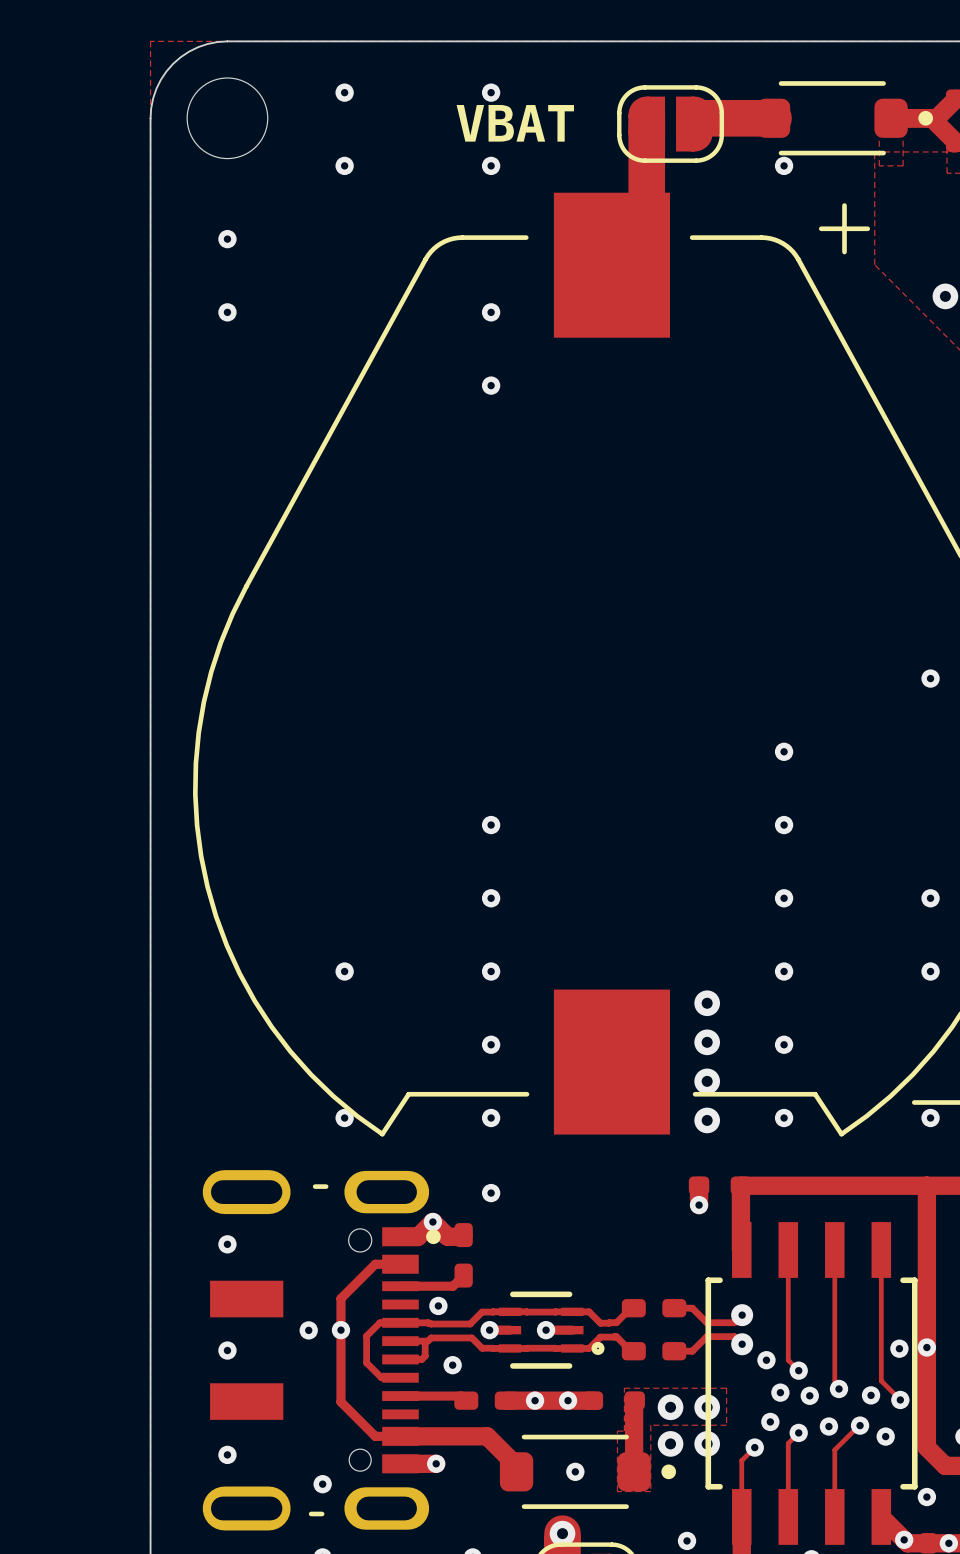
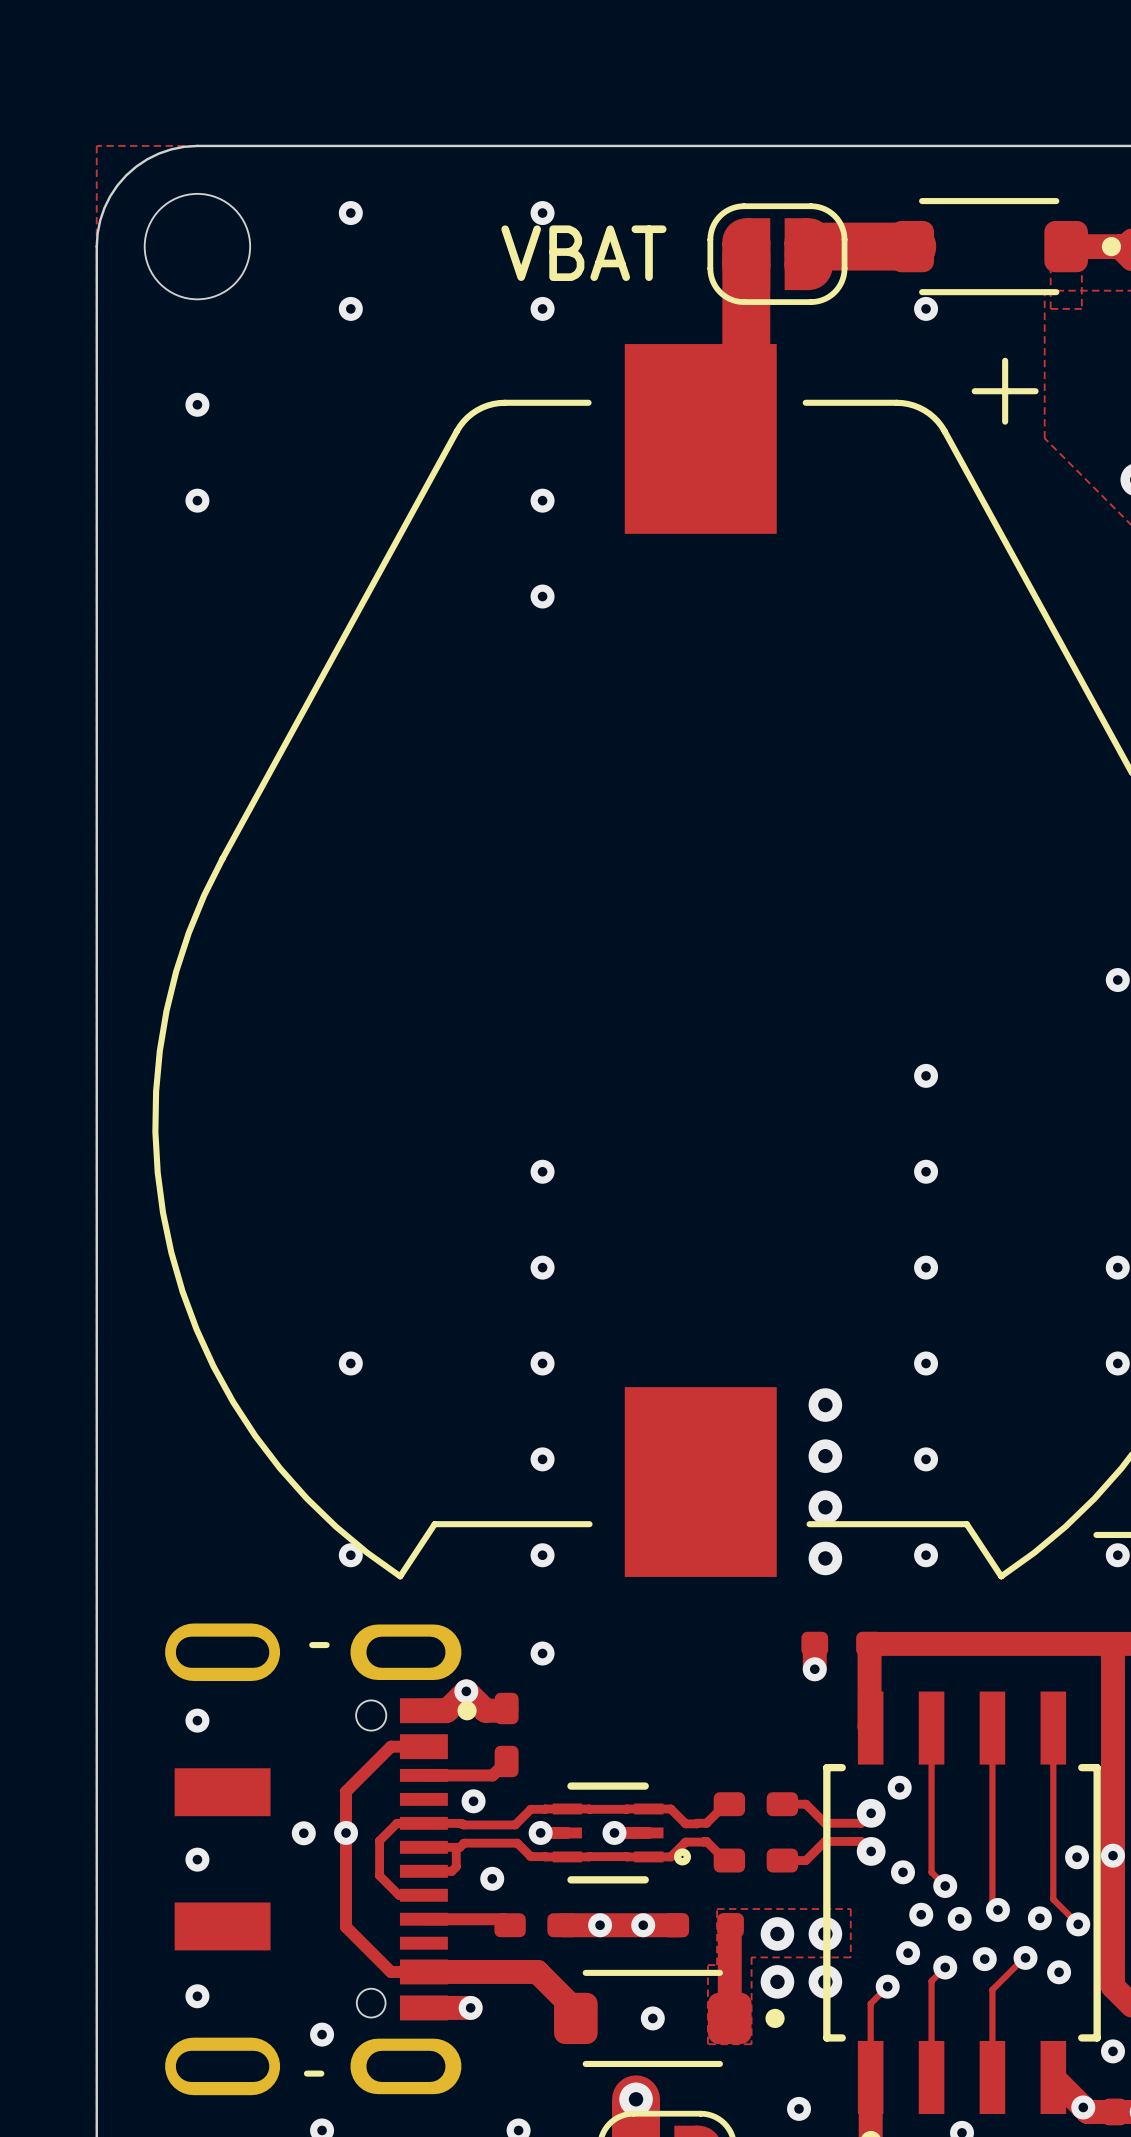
via: none -> (899, 1787)

